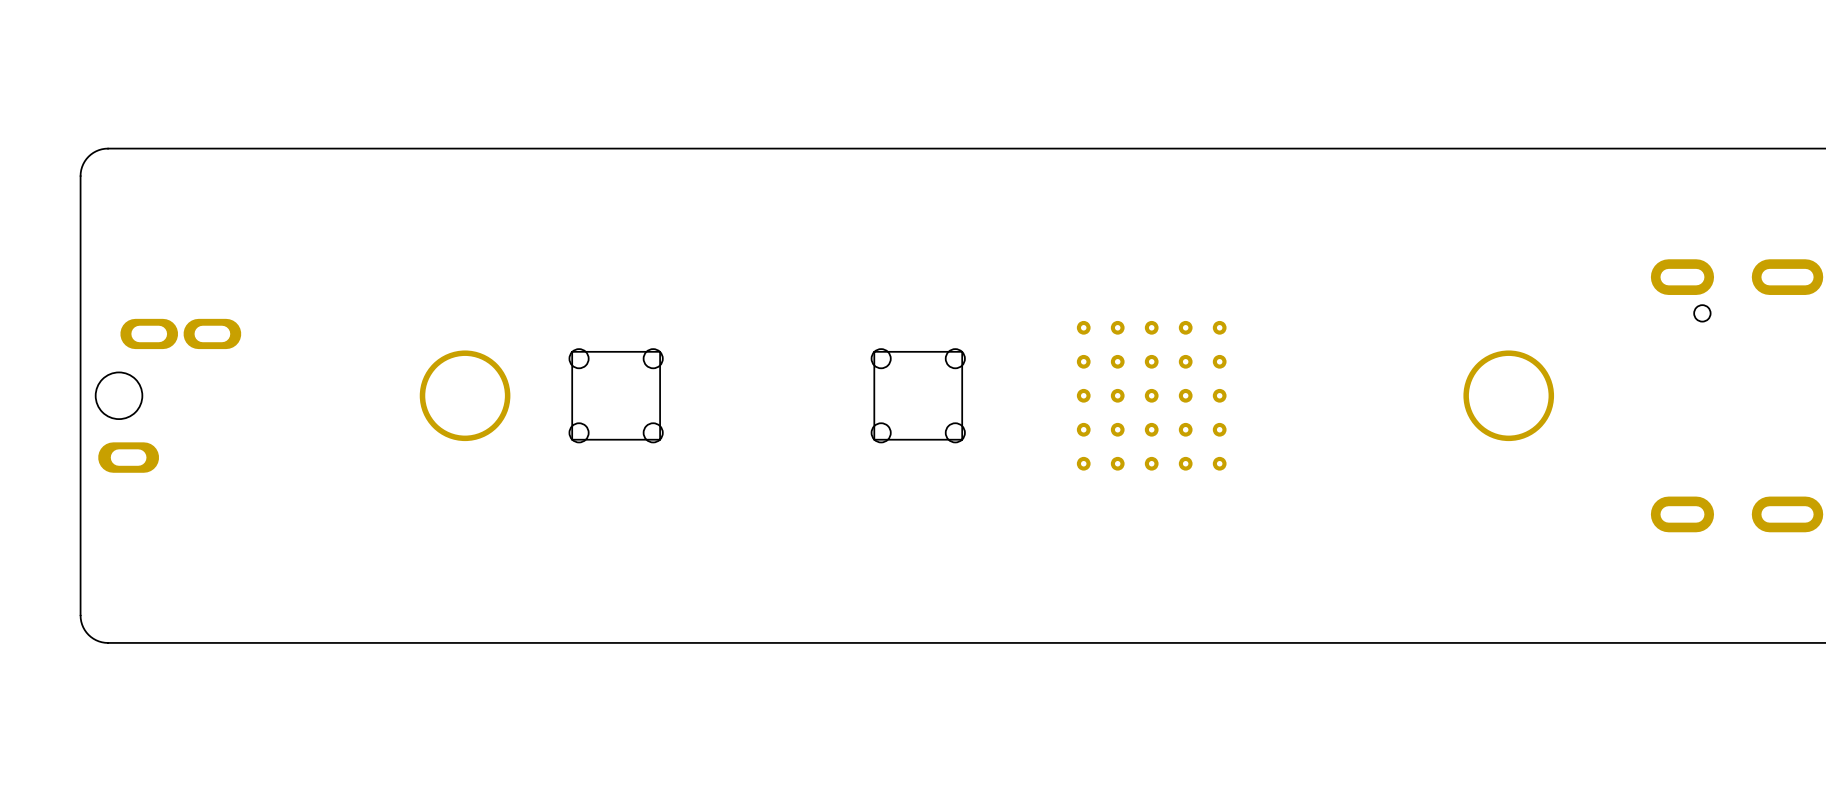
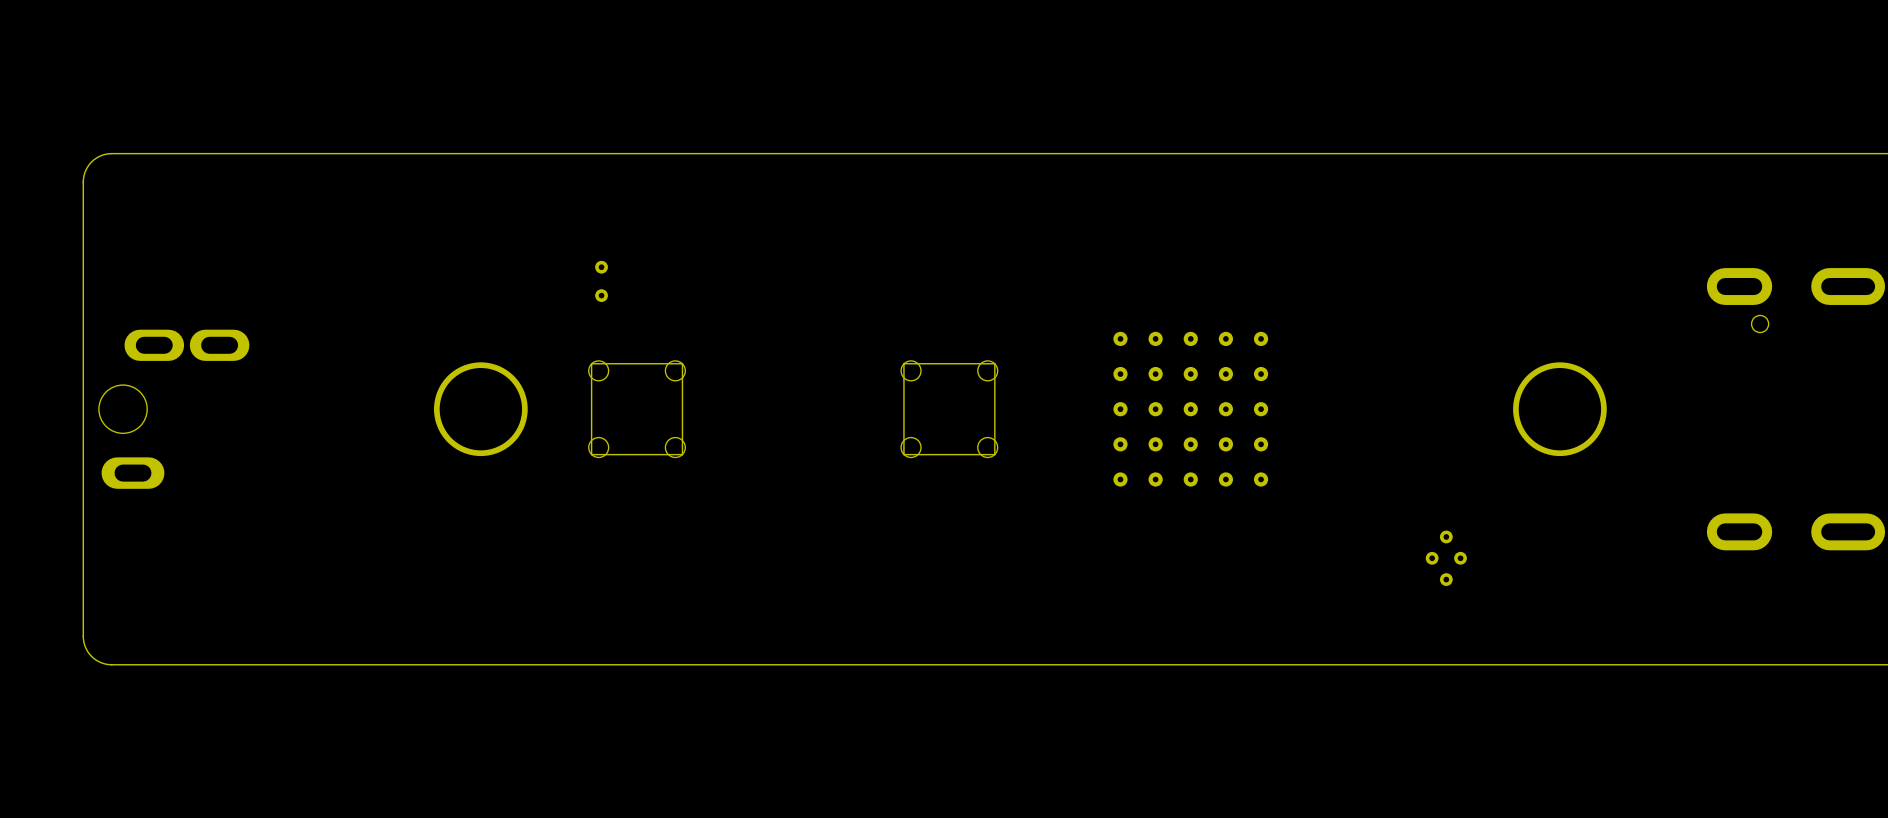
part: none -> (601, 281)
part: none -> (1446, 558)

